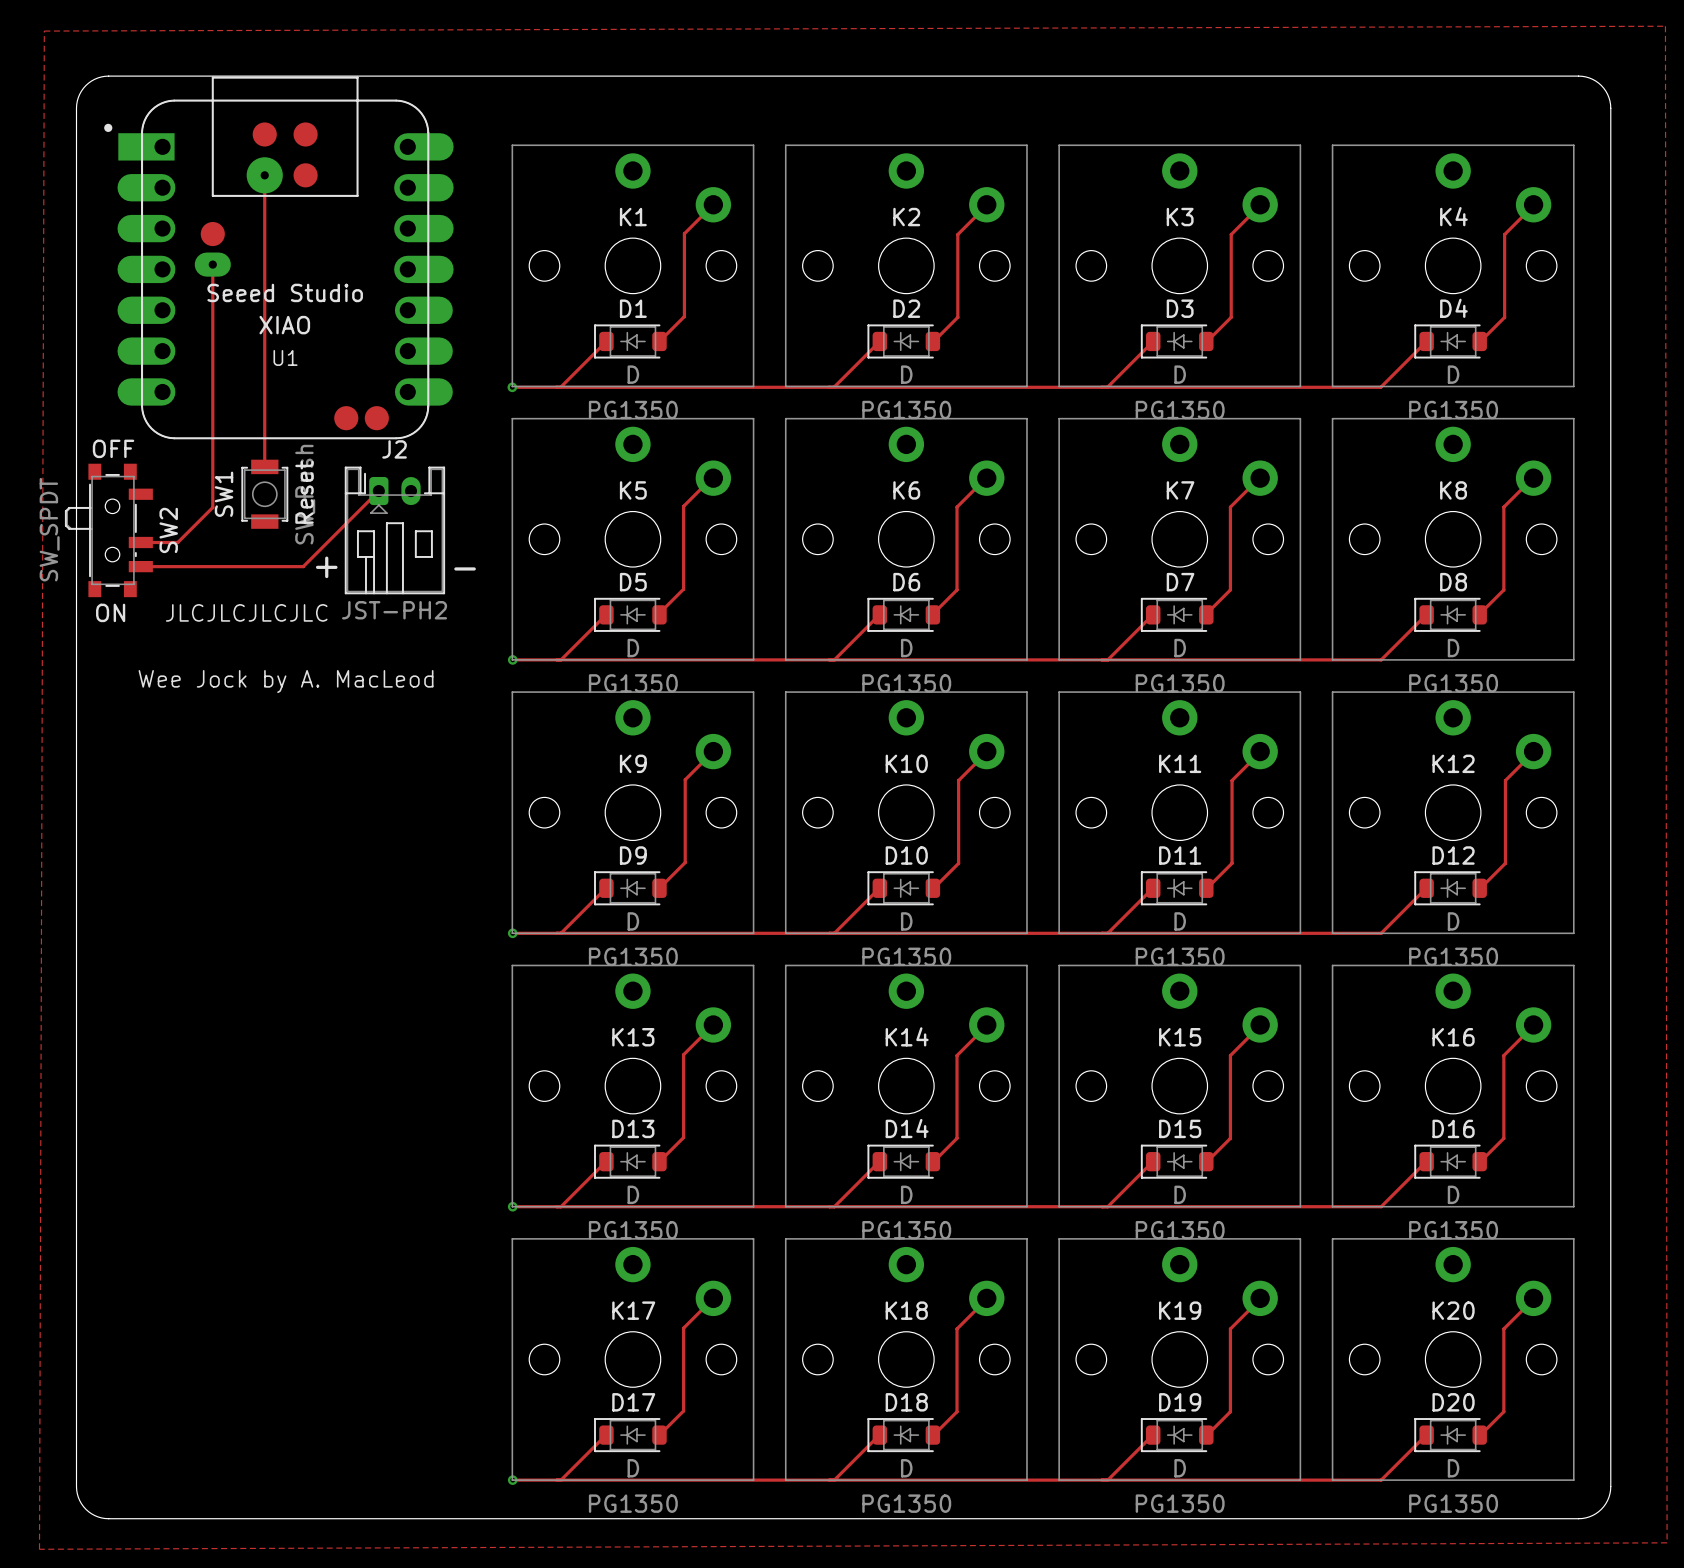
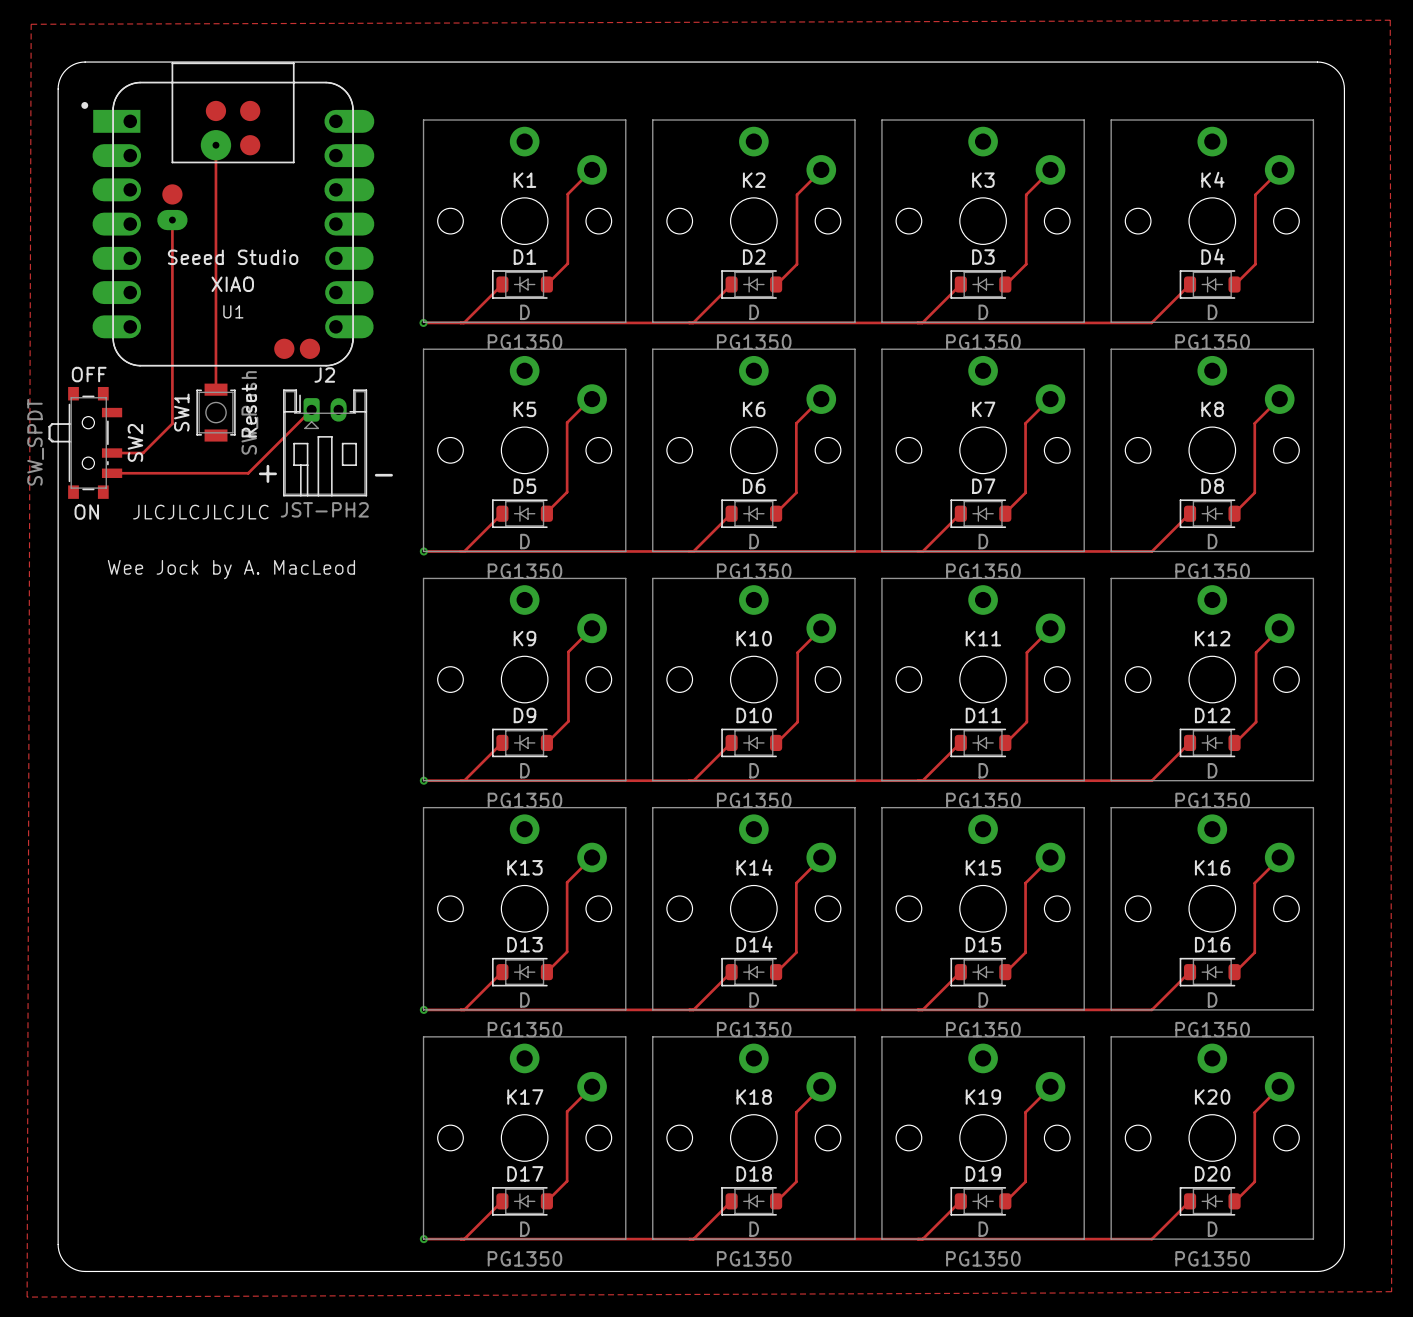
U1 text position: Seeed Studio (285, 292) -> Seeed Studio (233, 257)
U1 text position: XIAO (284, 325) -> XIAO (232, 284)
U1 name position: U1 (285, 357) -> U1 (233, 311)
text position: Wee Jock by A. MacLeod (286, 681) -> Wee Jock by A. MacLeod (231, 569)

